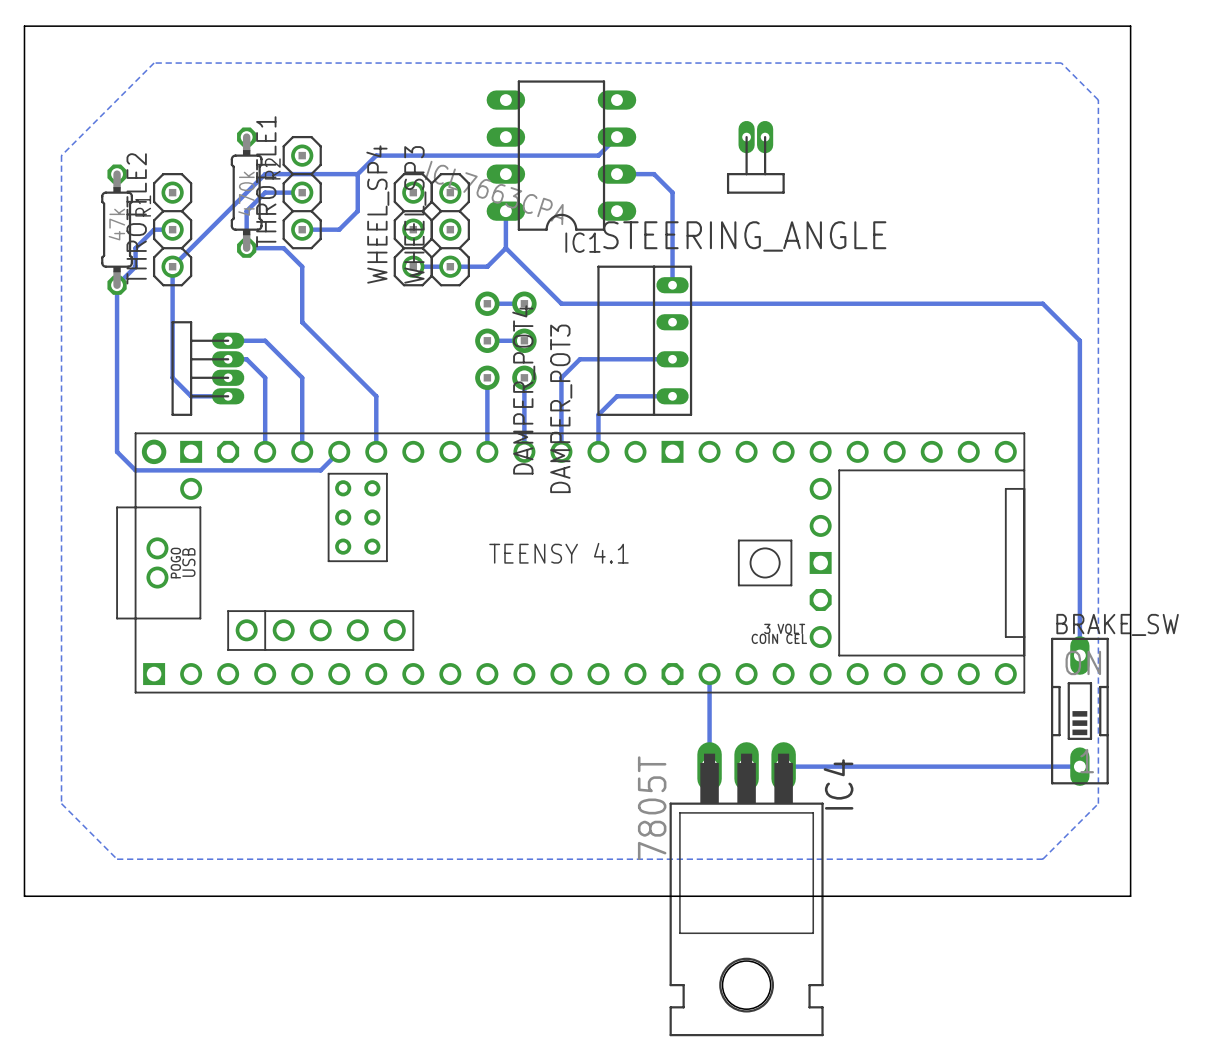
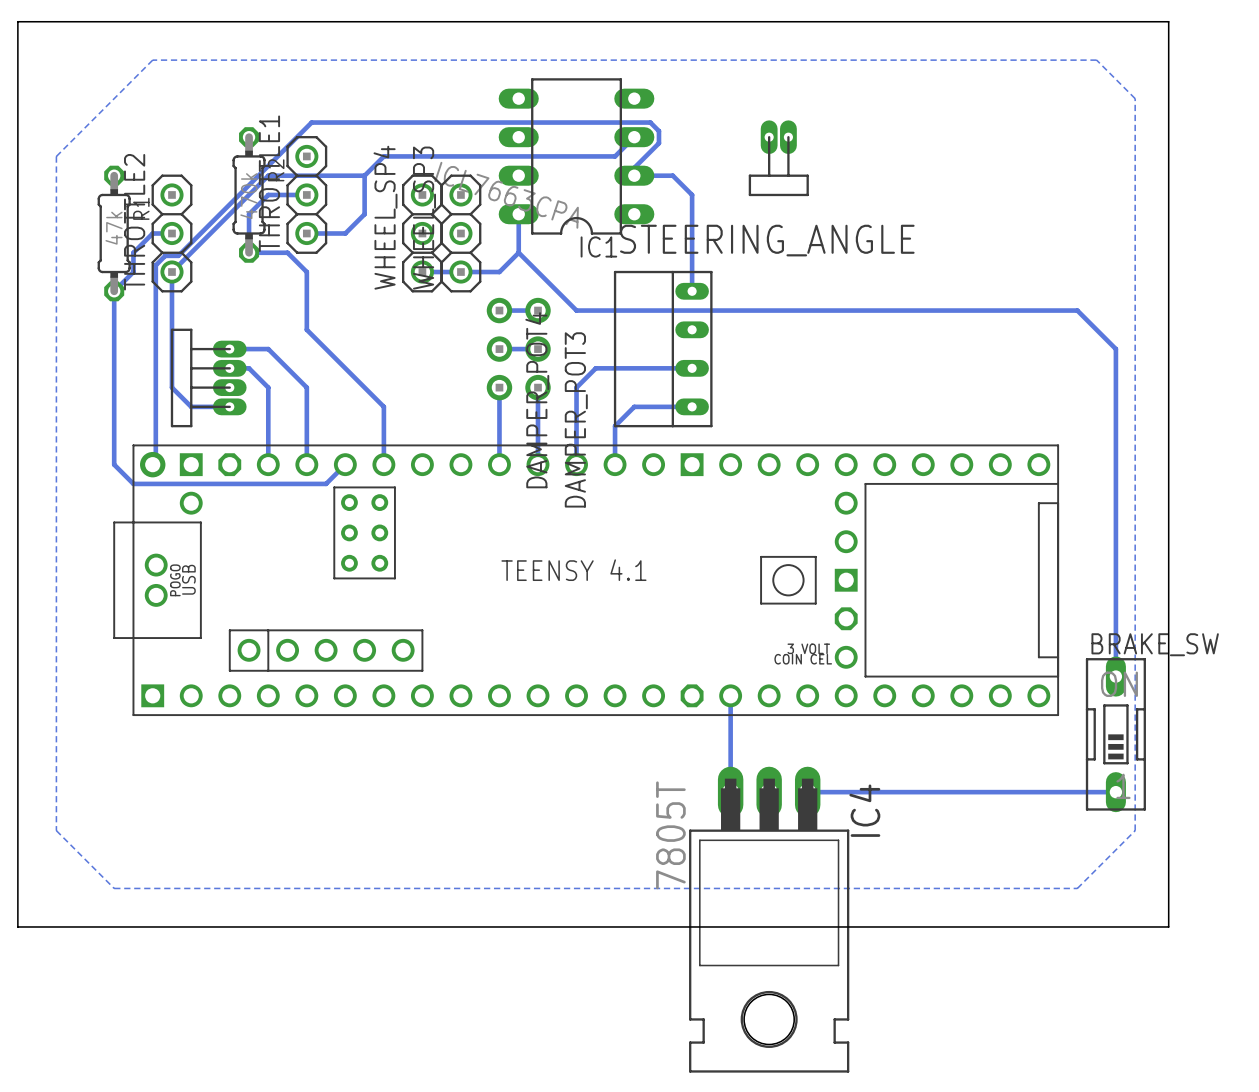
bottom track: none -> (634, 175) (634, 167) (658, 143) (658, 131) (650, 122) (311, 122) (178, 255) (165, 255) (155, 265) (155, 461) (152, 464)

